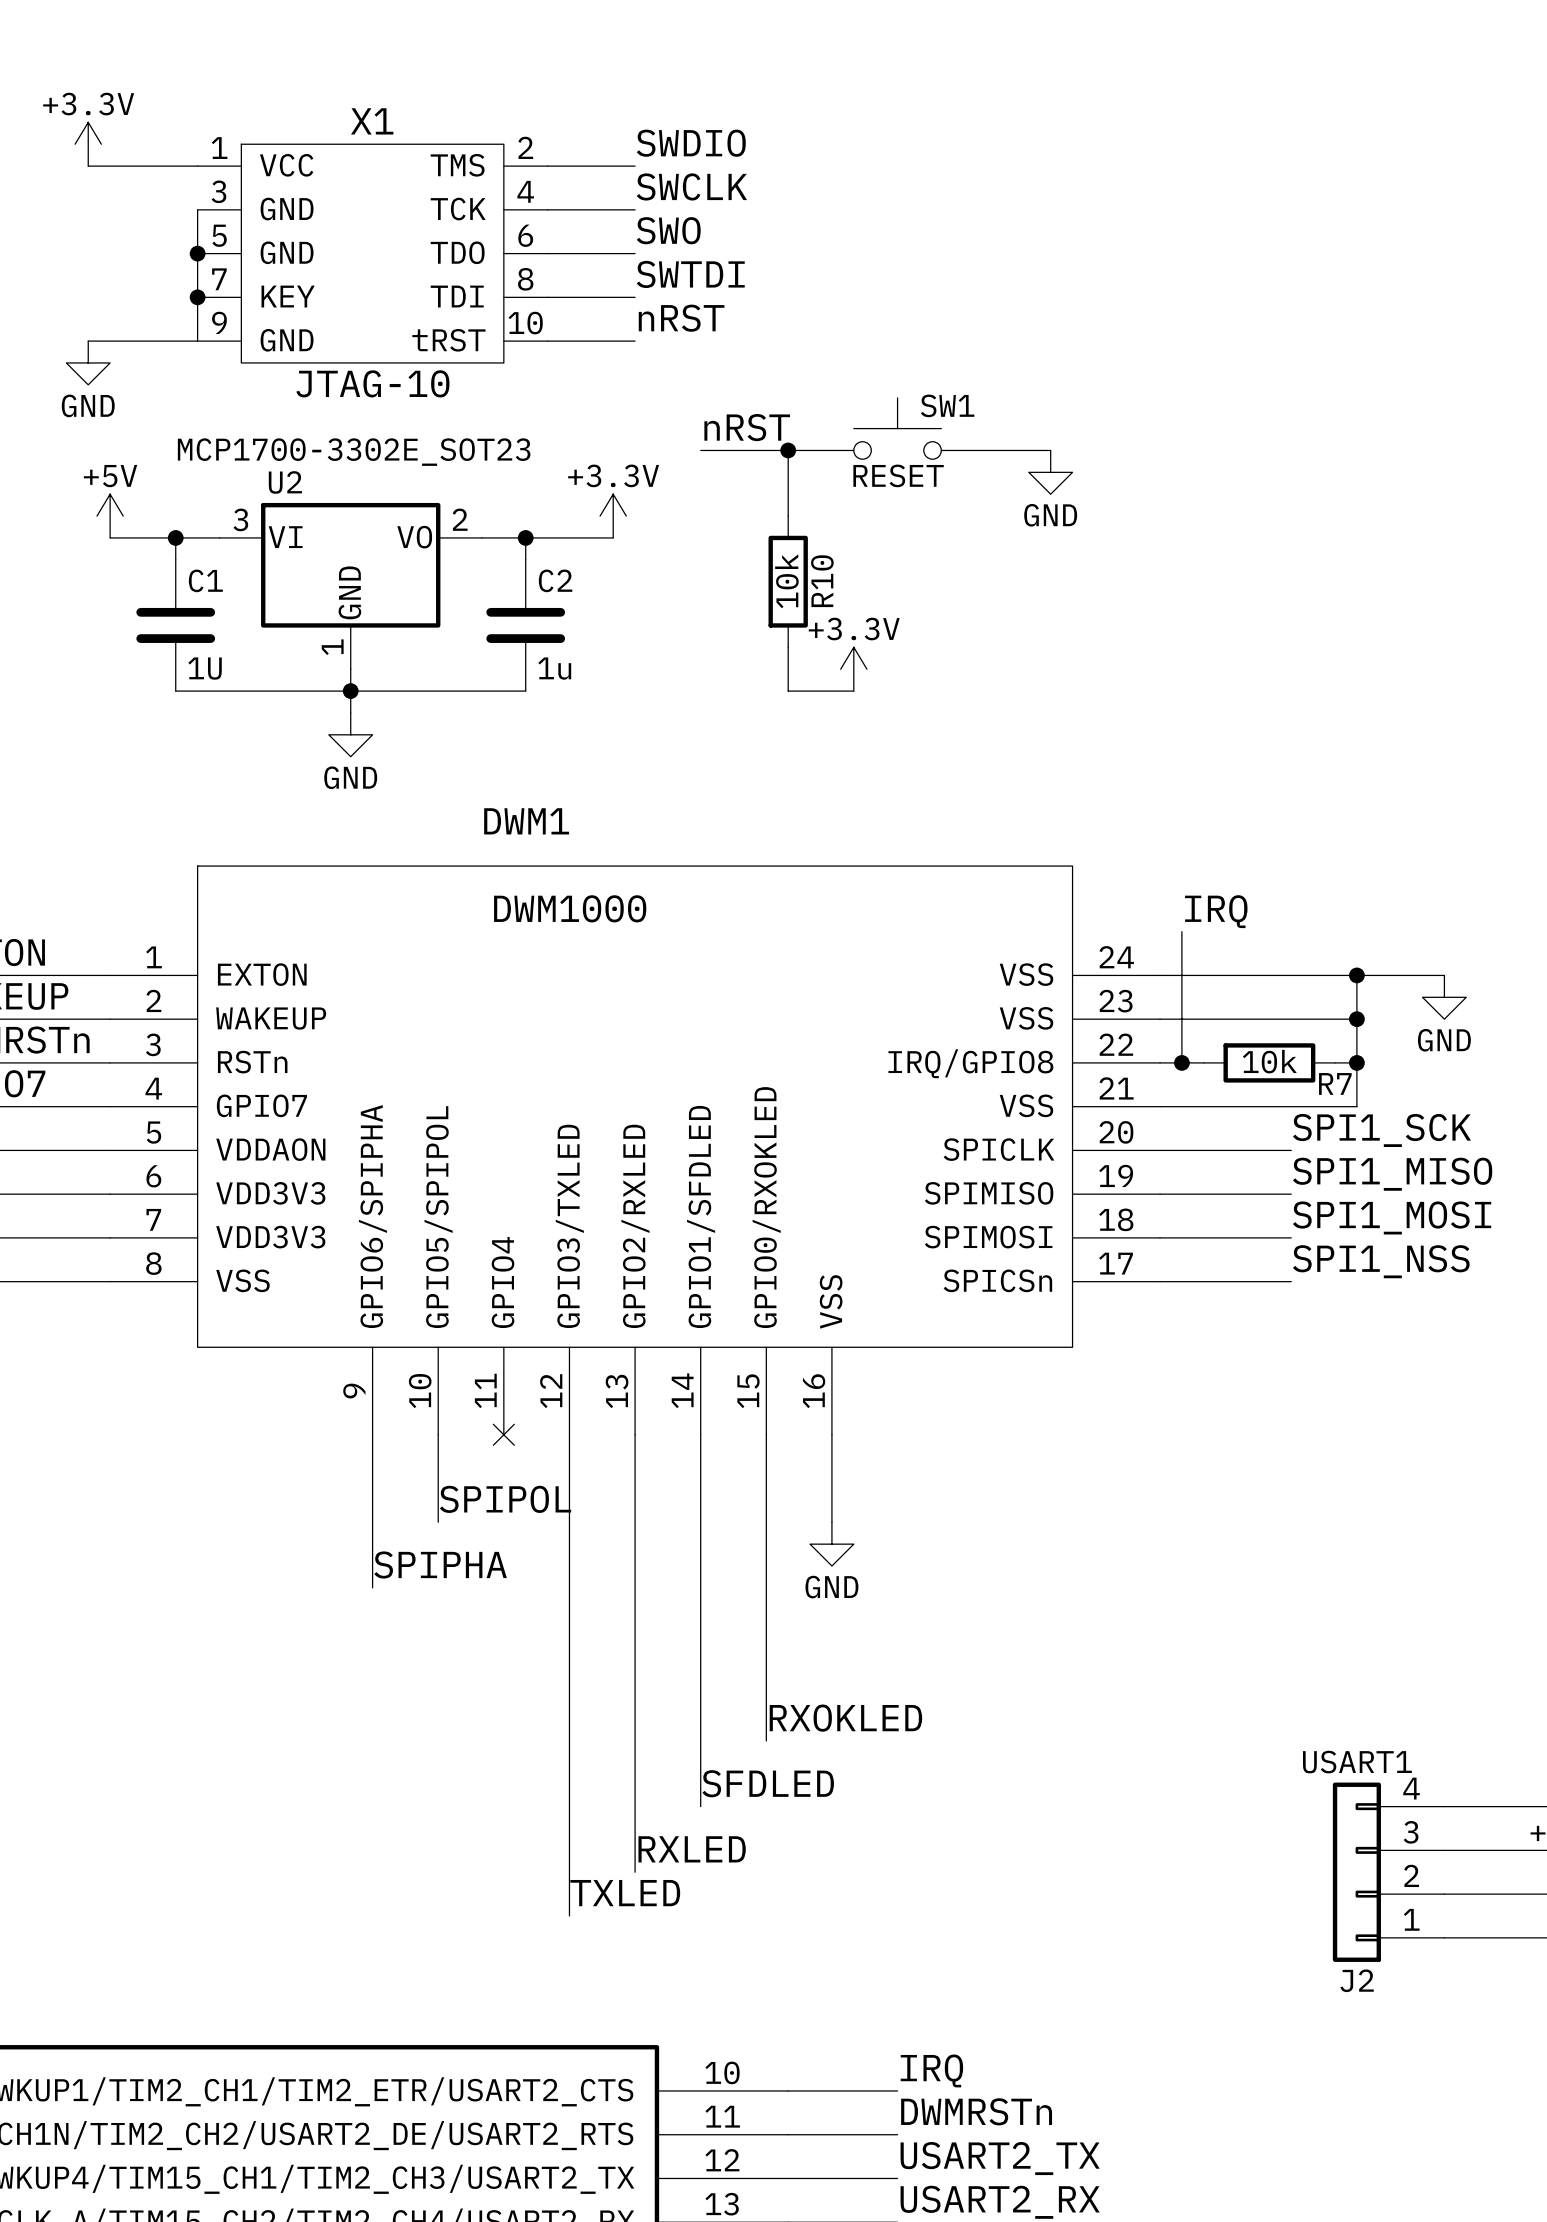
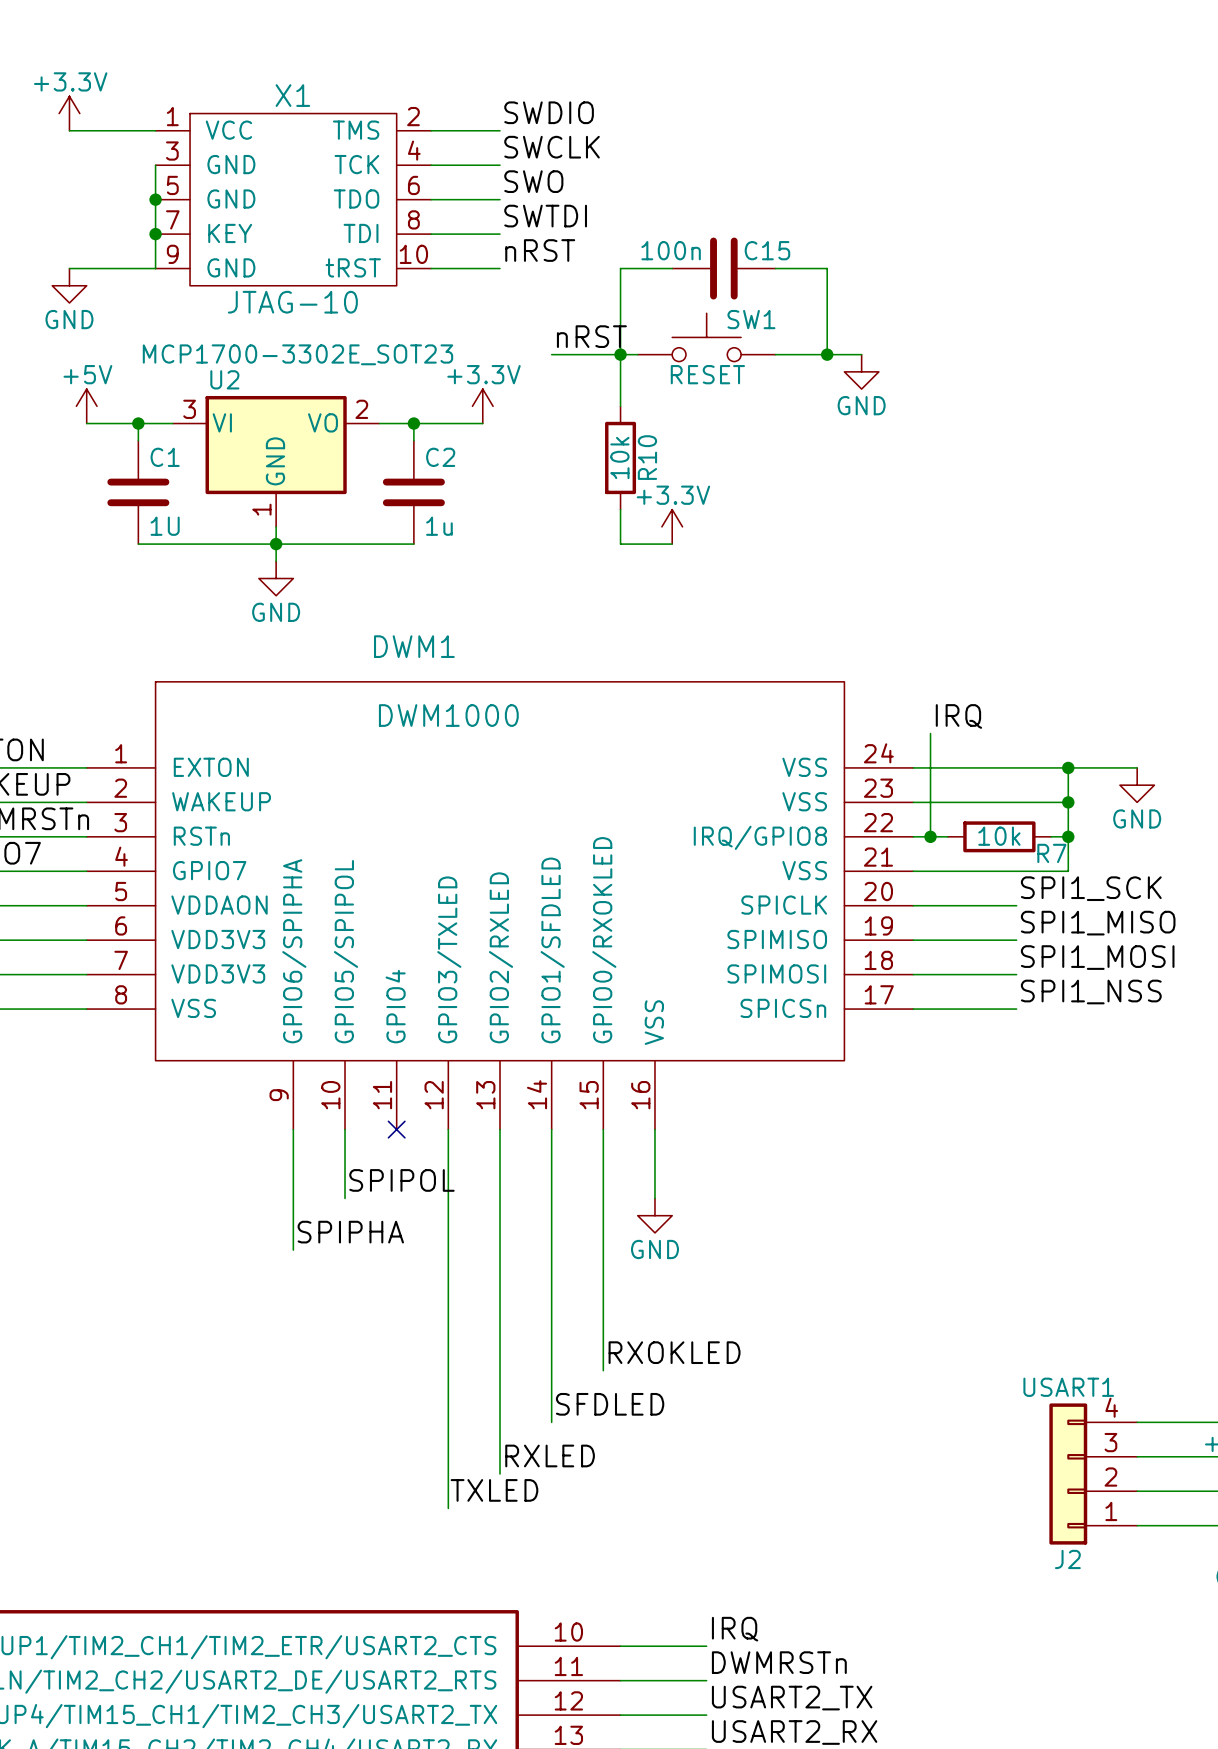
wire: none -> (672, 268) (620, 268) (620, 354)
C15: none -> 100n (723, 268)
wire: none -> (775, 268) (827, 268) (827, 354) (861, 354)
junction: none -> (827, 354)
power symbol position: GND (1050, 472) -> GND (861, 371)

